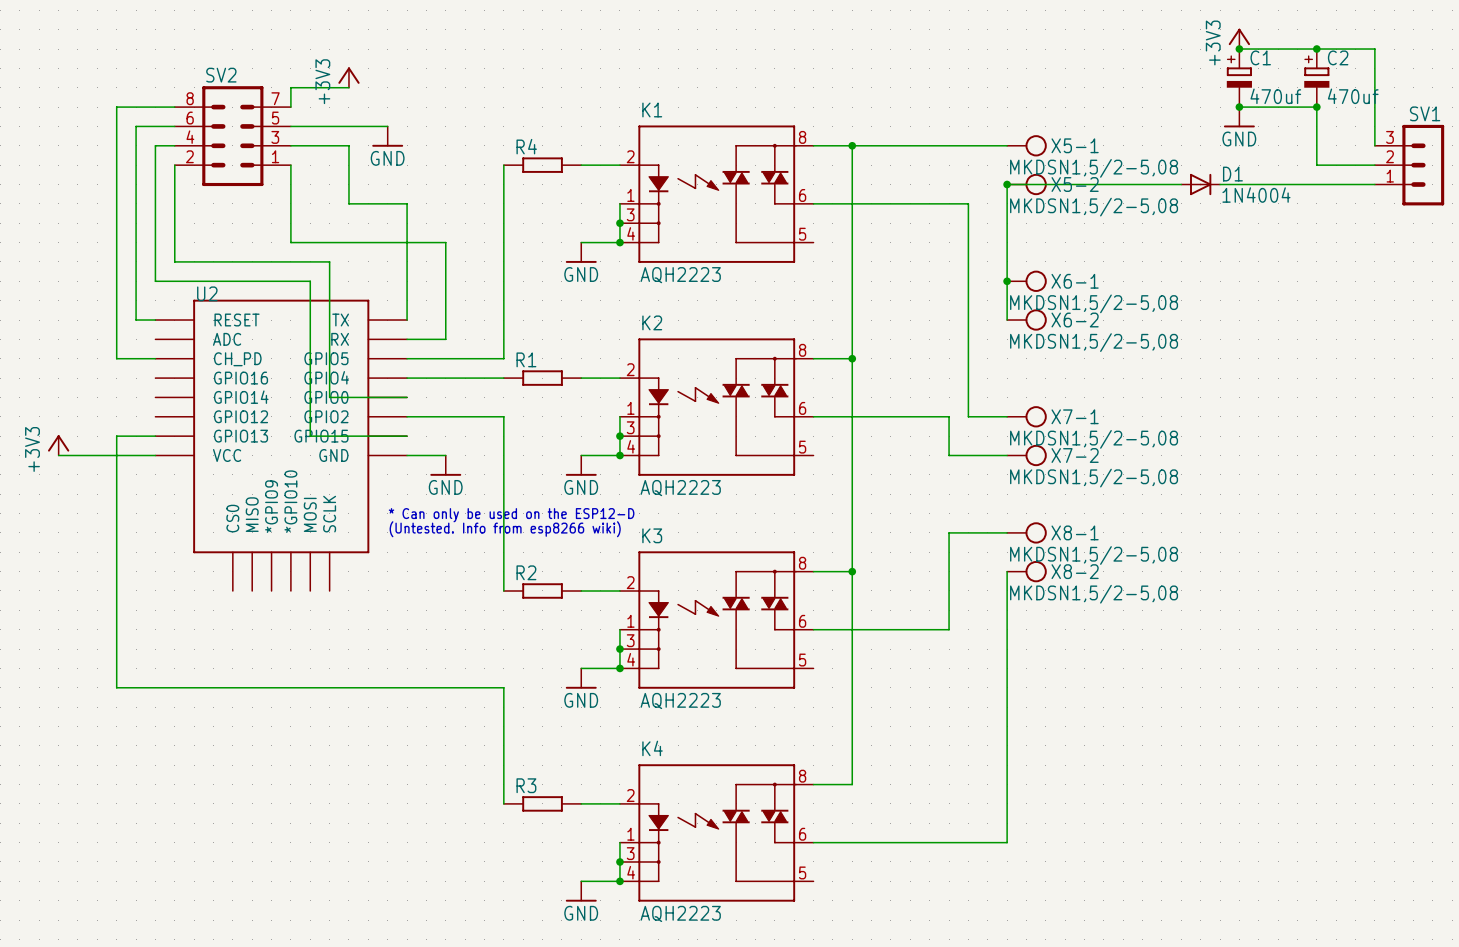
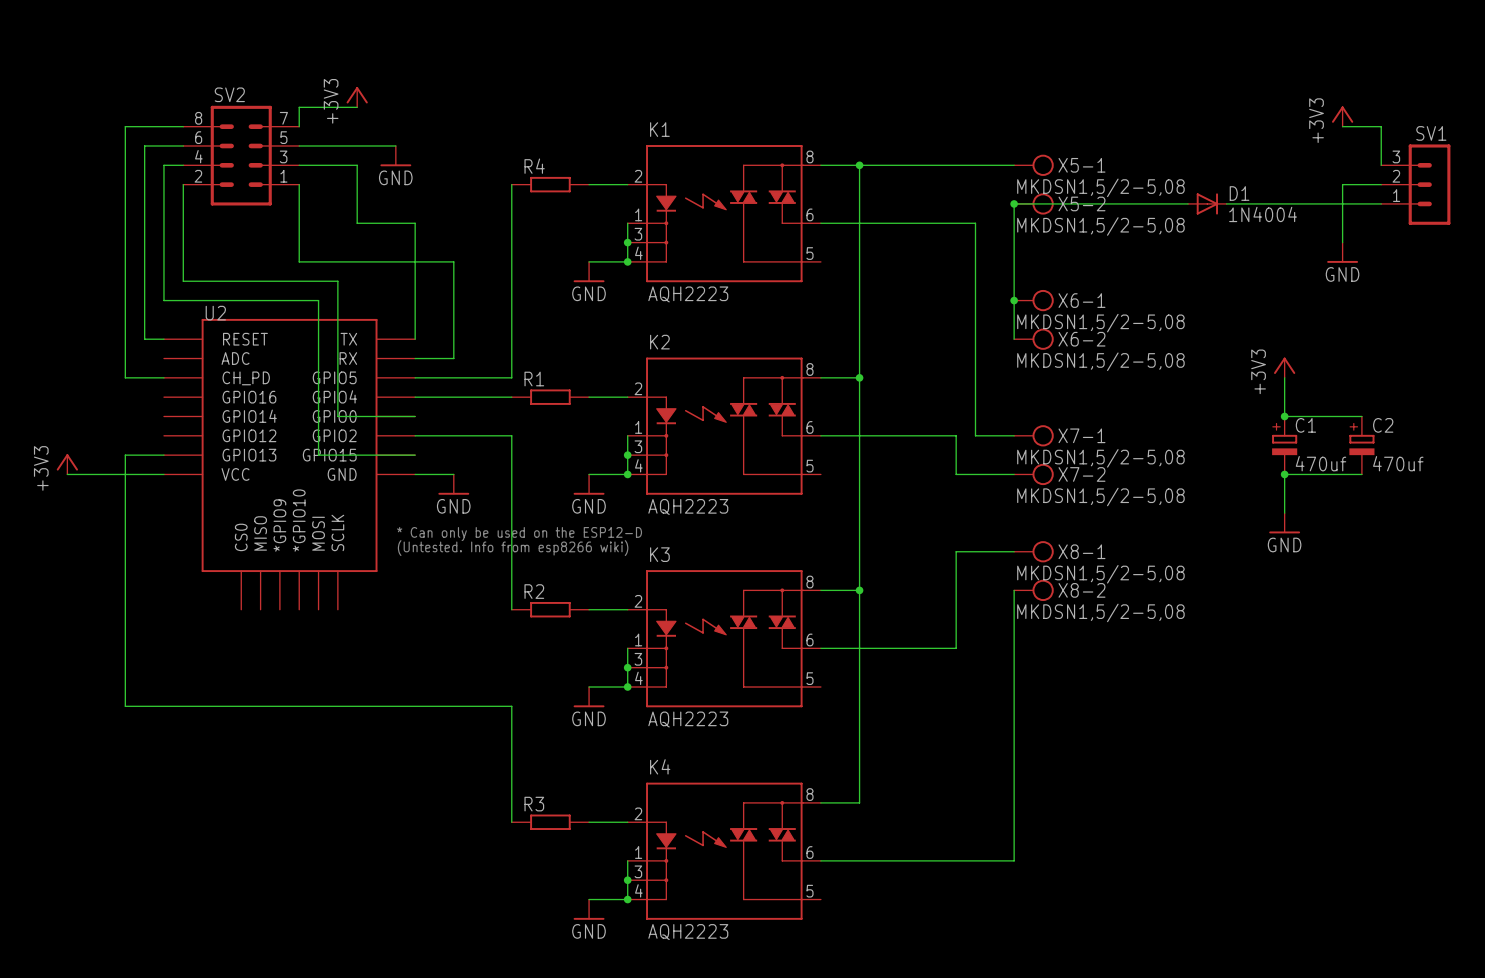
power symbol position: +3V3 (1239, 38) -> +3V3 (1342, 116)
wire: (1239, 49) (1374, 49) (1374, 107) -> (1342, 126) (1381, 126)
junction: (1239, 49) -> none
junction: (1316, 49) -> none
C1 position: (1239, 78) -> (1284, 445)
C2 position: (1316, 78) -> (1361, 445)
wire: (1239, 107) (1316, 107) (1316, 165) (1336, 165) -> (1342, 242) (1342, 184)
junction: (1239, 107) -> none
junction: (1316, 107) -> none
power symbol position: GND (1239, 117) -> GND (1342, 252)
power symbol: none -> +3V3 (1284, 367)
wire: none -> (1284, 377) (1284, 416) (1361, 416)
junction: none -> (1284, 416)
junction: none -> (1284, 474)
wire: none -> (1361, 474) (1284, 474) (1284, 513)
power symbol: none -> GND (1284, 523)

